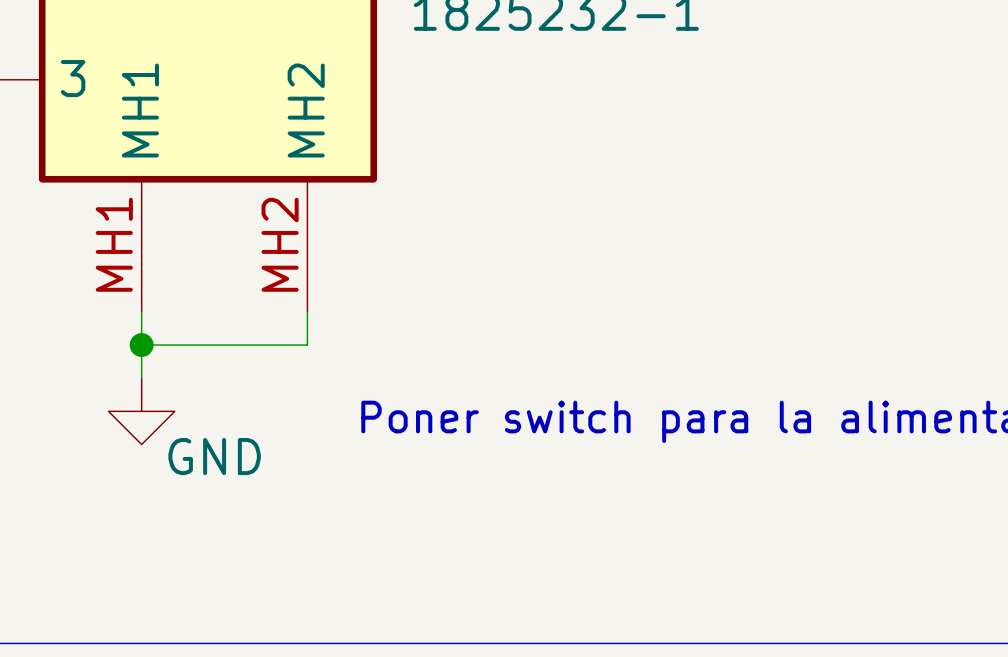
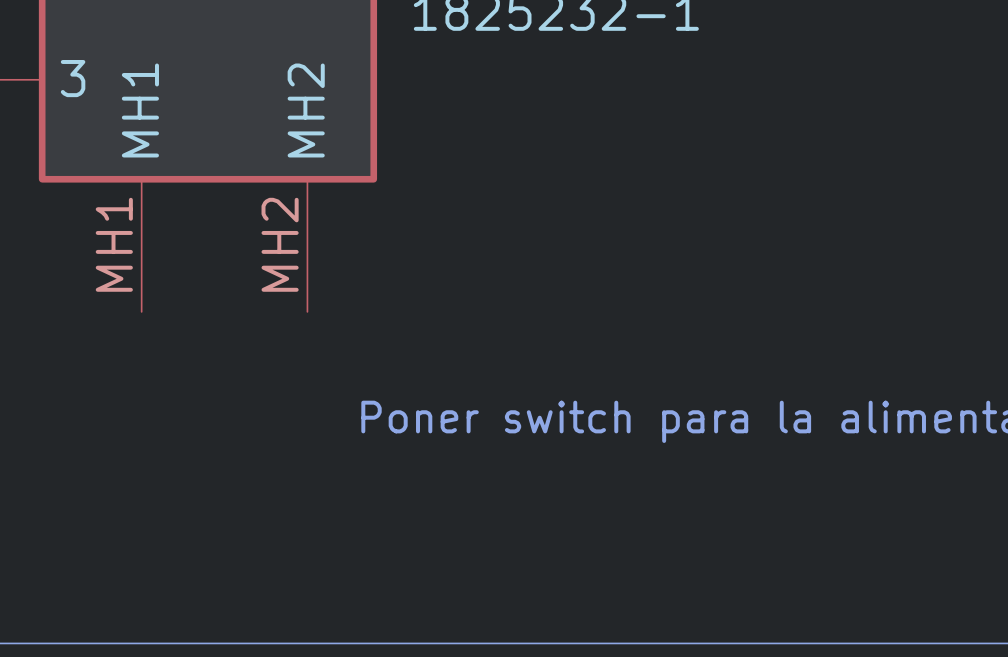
wire: (141, 311) (141, 378) -> none
wire: (307, 311) (307, 345) (141, 345) -> none
junction: (141, 345) -> none
power symbol: GND (141, 411) -> none

